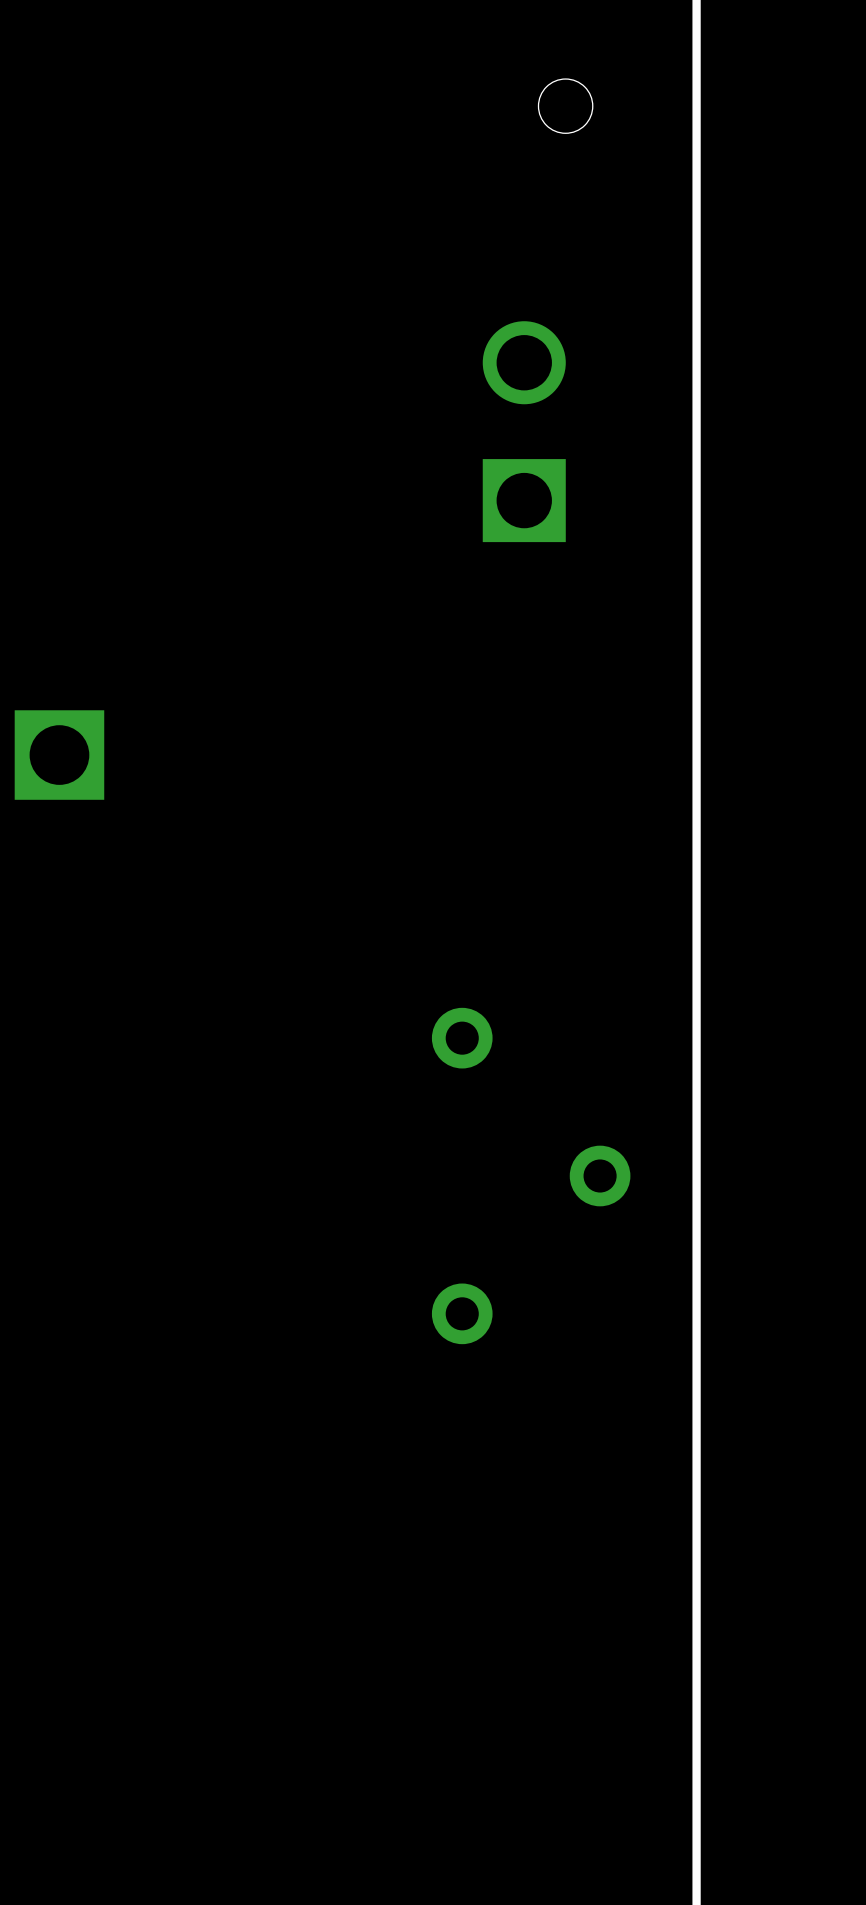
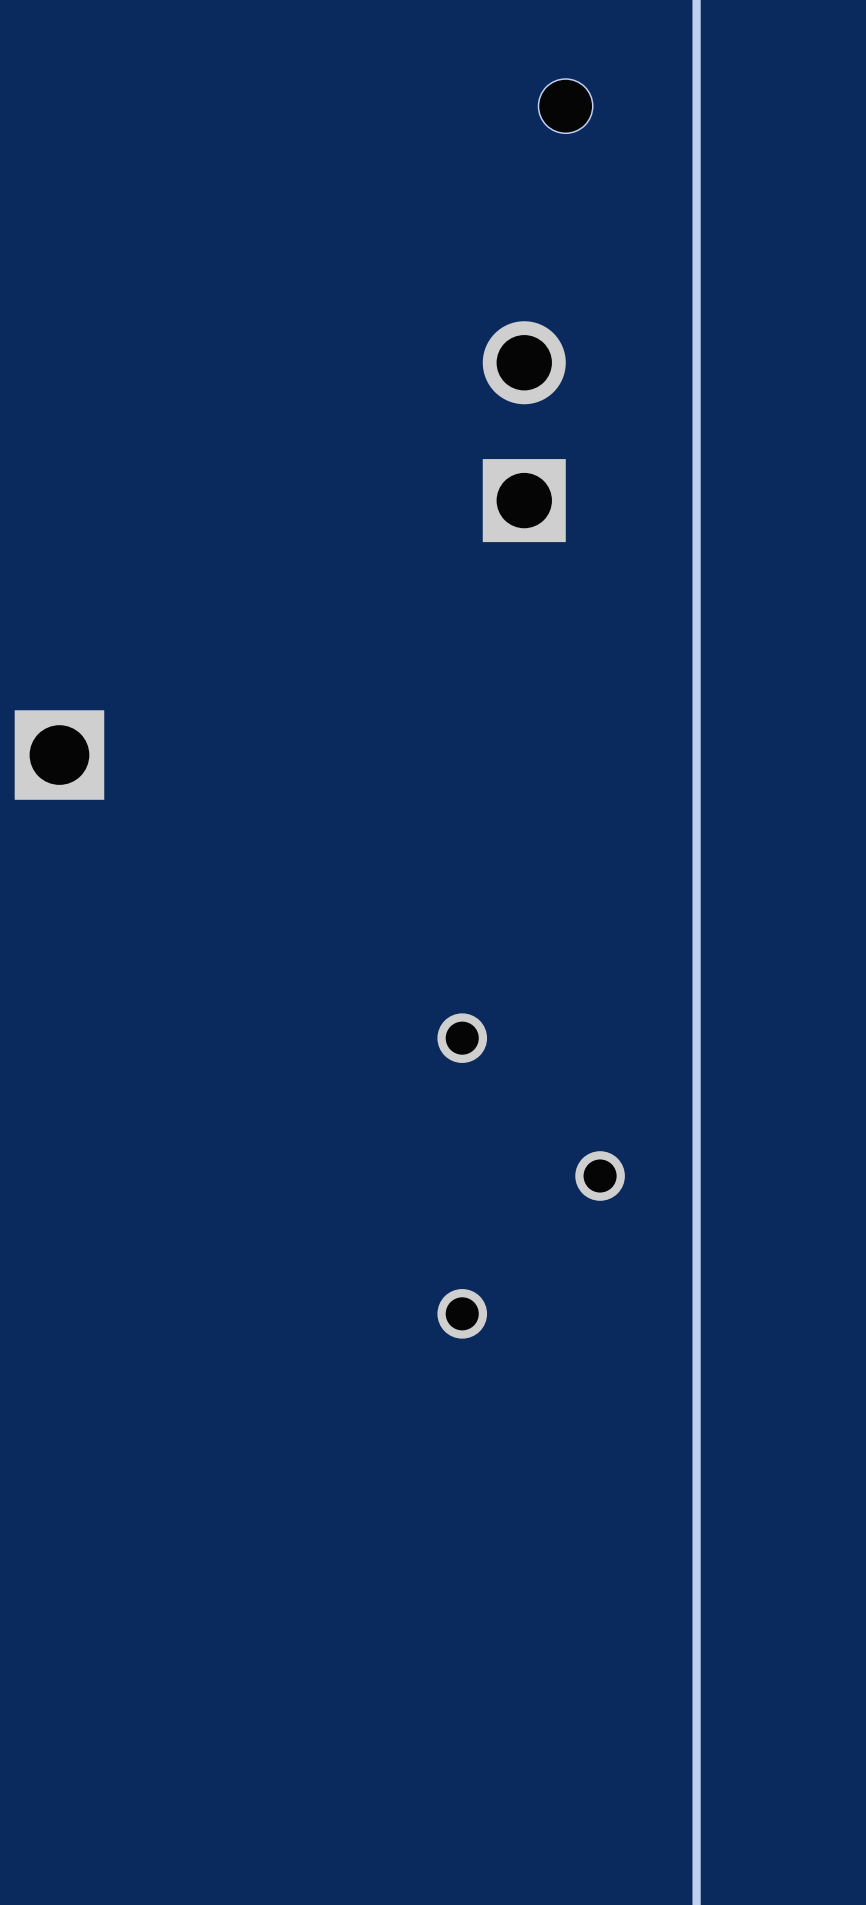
part footprint: [431, 1007, 631, 1345] -> [437, 1013, 625, 1339]

